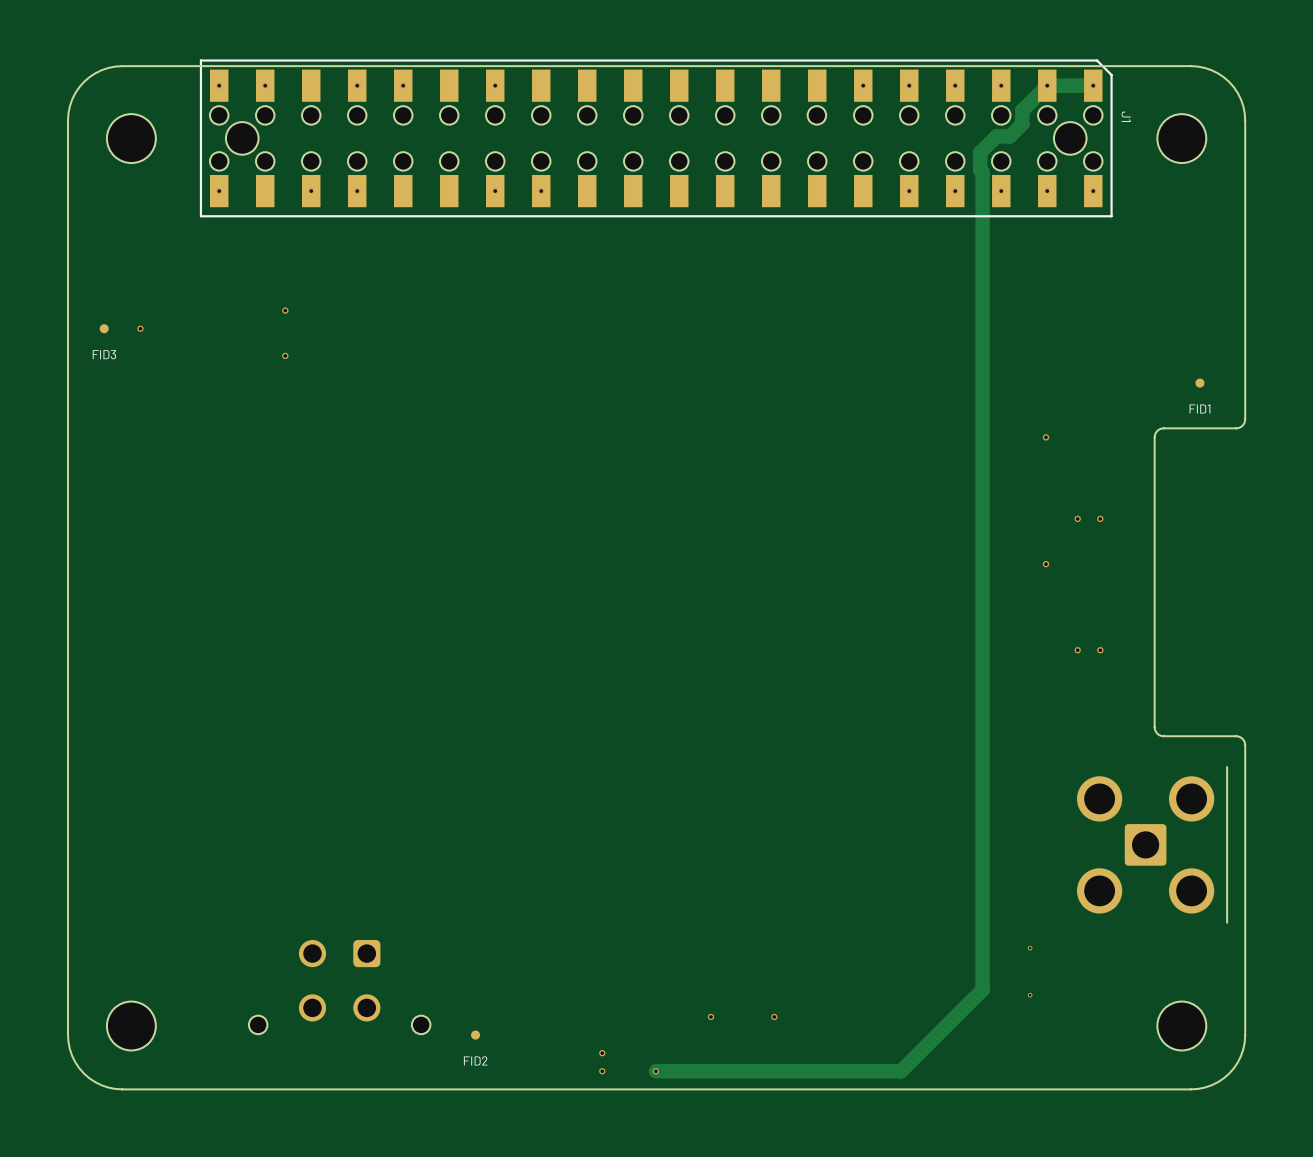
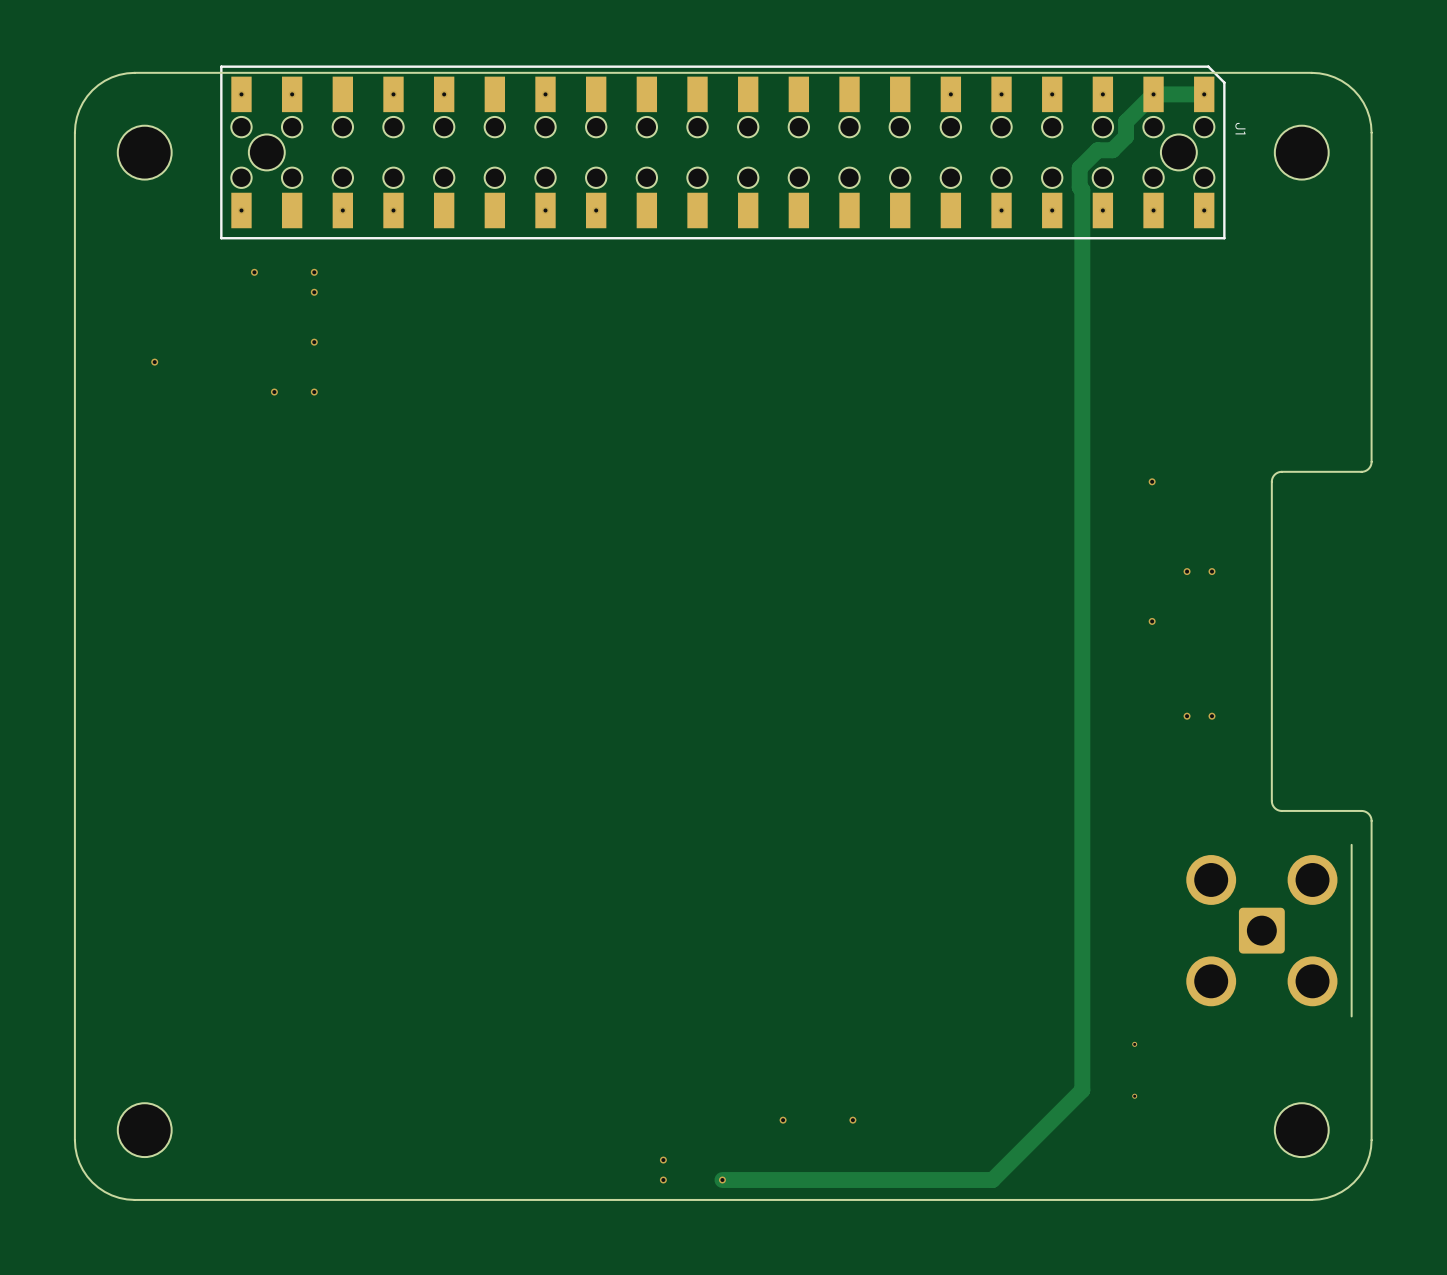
via: none -> (254, 272)
via: none -> (314, 272)
via: none -> (314, 292)
FID3: (104, 328) -> none
via: none -> (274, 392)
FID1: (1199, 383) -> none
part: (339, 987) -> none
FID2: (475, 1035) -> none

